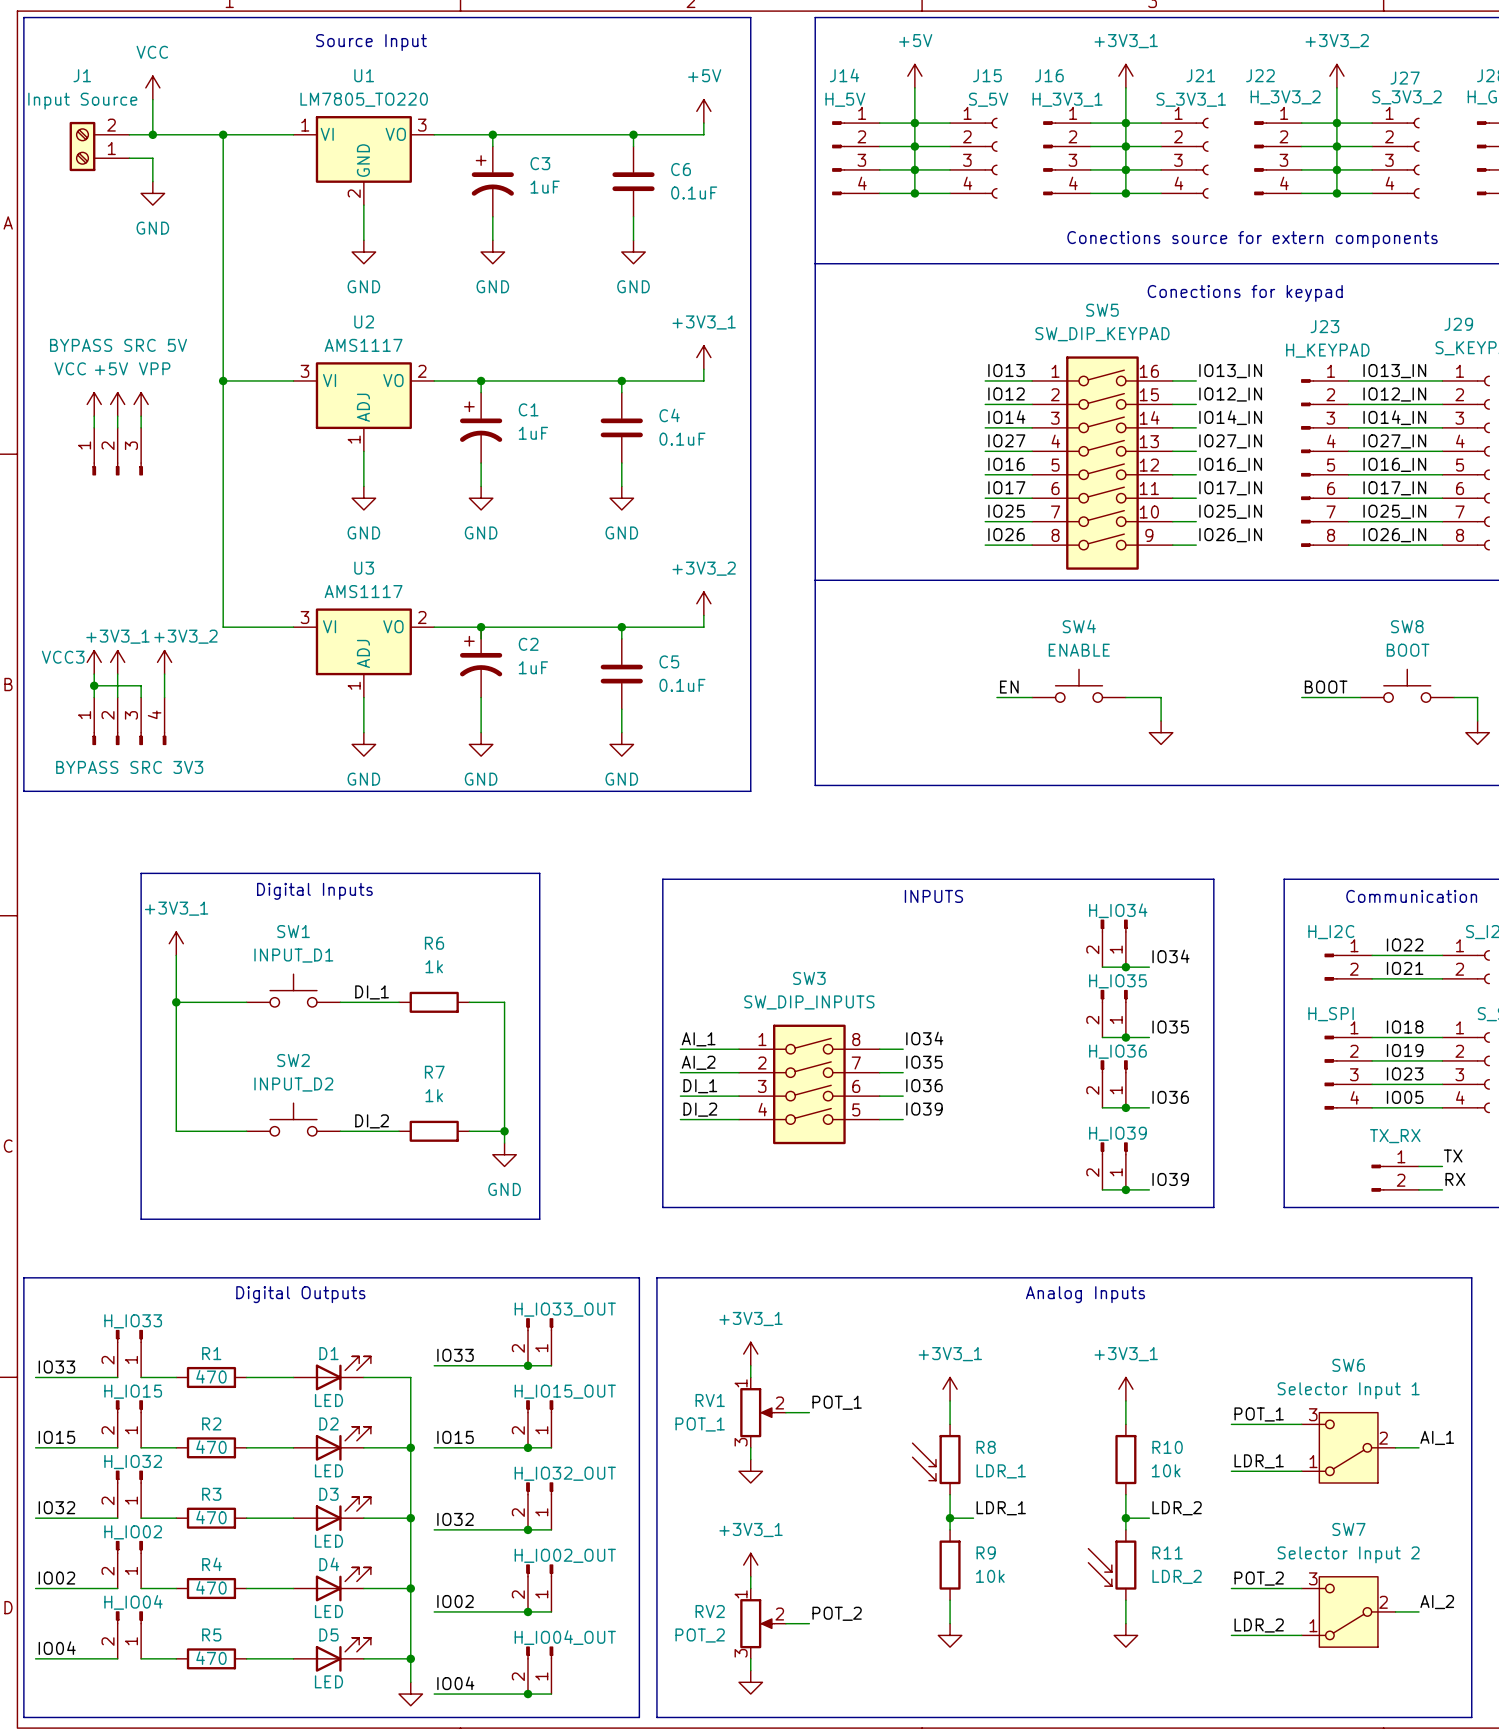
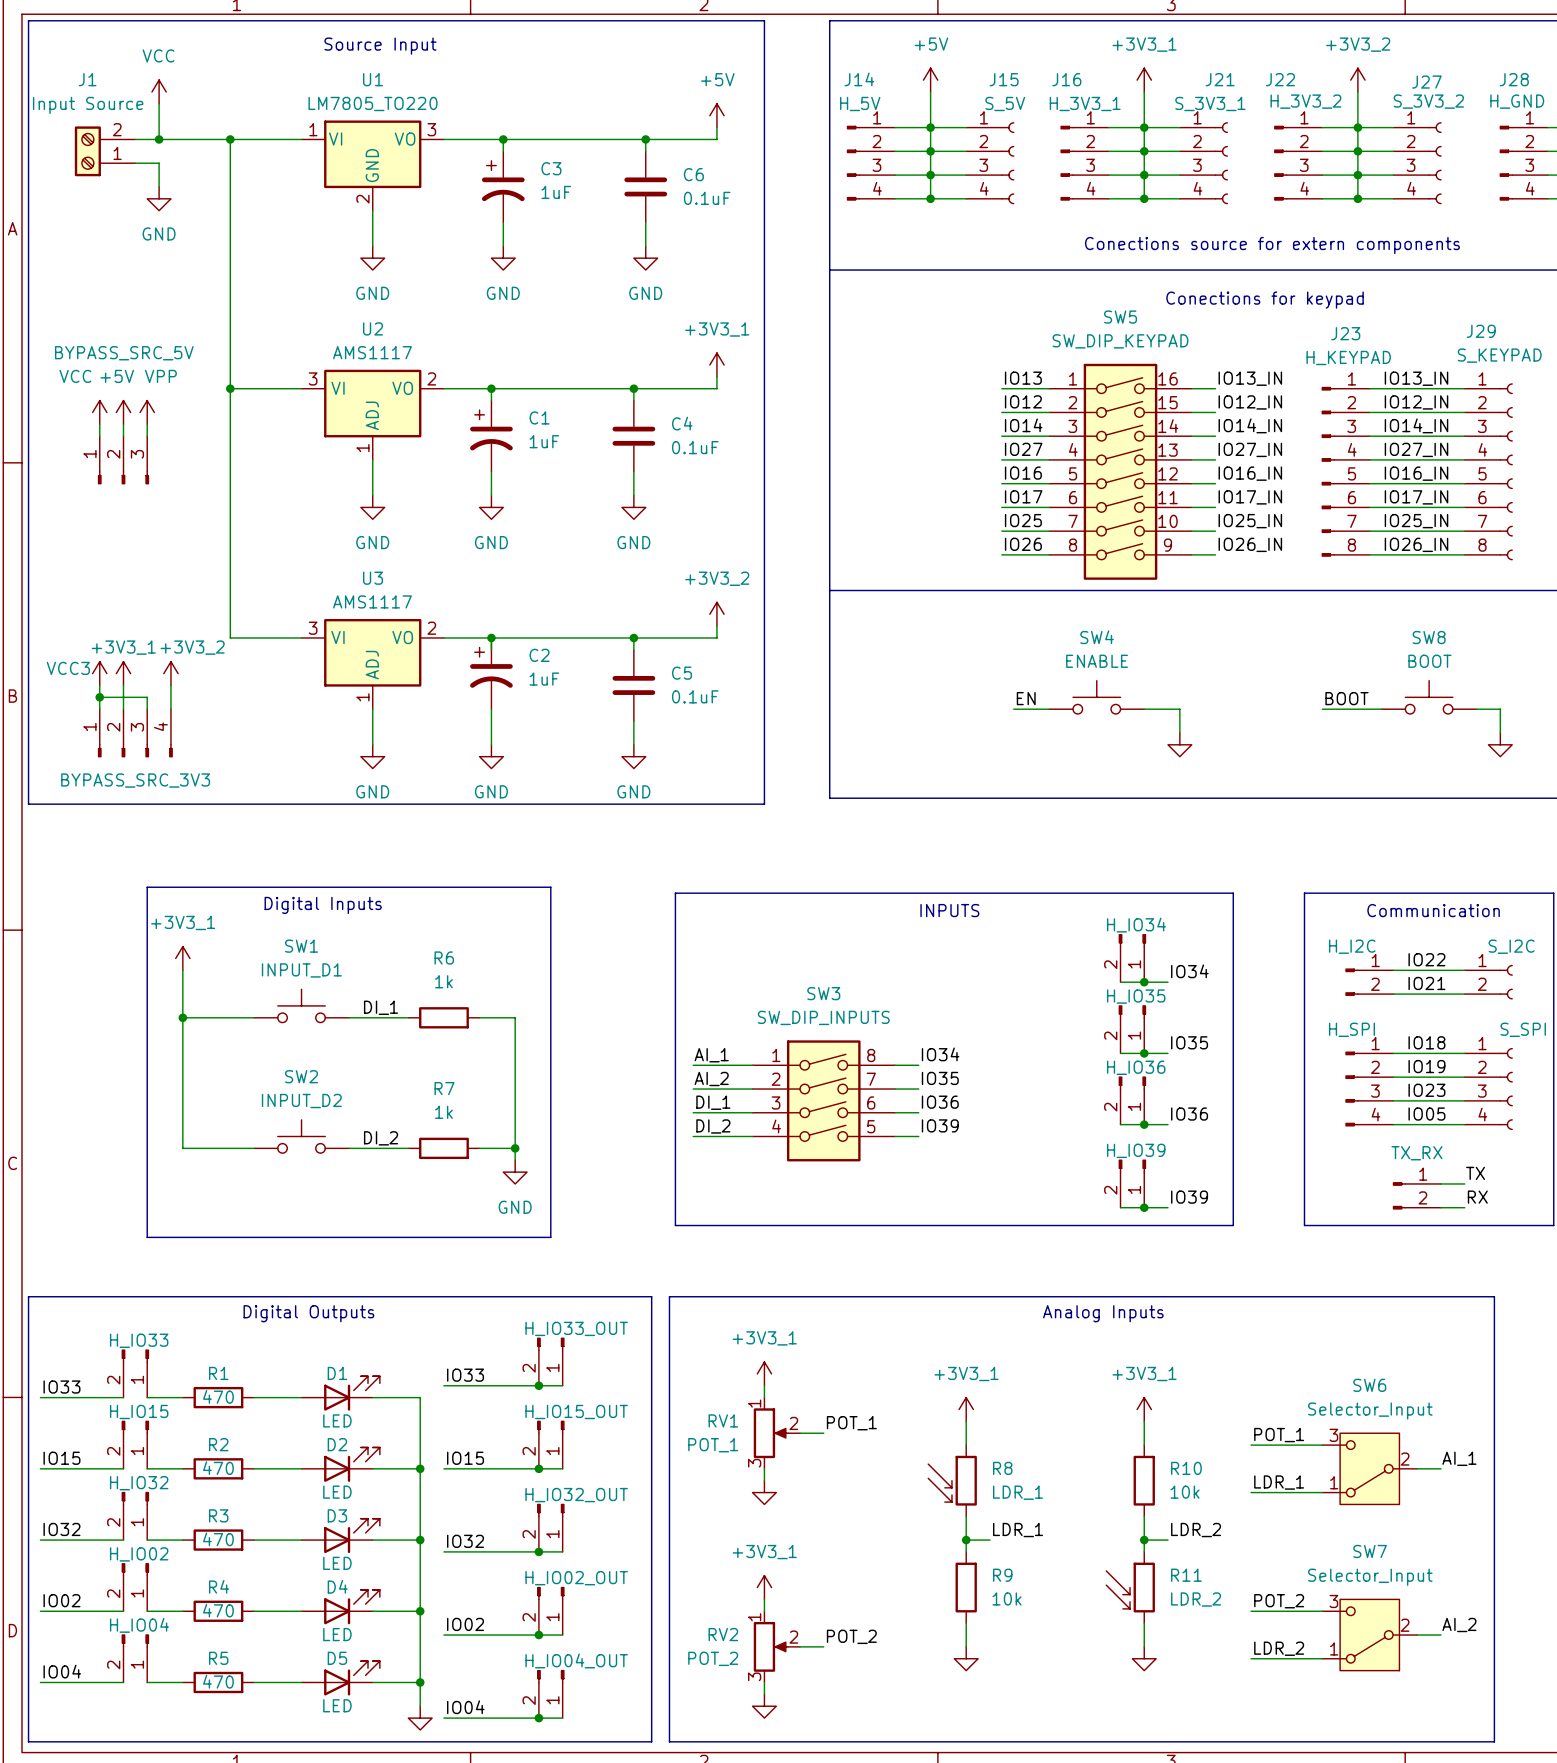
part value: BYPASS SRC 5V (118, 345) -> BYPASS_SRC_5V (124, 353)
part value: BYPASS SRC 3V3 (129, 767) -> BYPASS_SRC_3V3 (135, 780)
SW6 value: Selector Input 1 (1348, 1390) -> Selector_Input (1370, 1411)
SW7 value: Selector Input 2 (1348, 1554) -> Selector_Input (1370, 1577)

